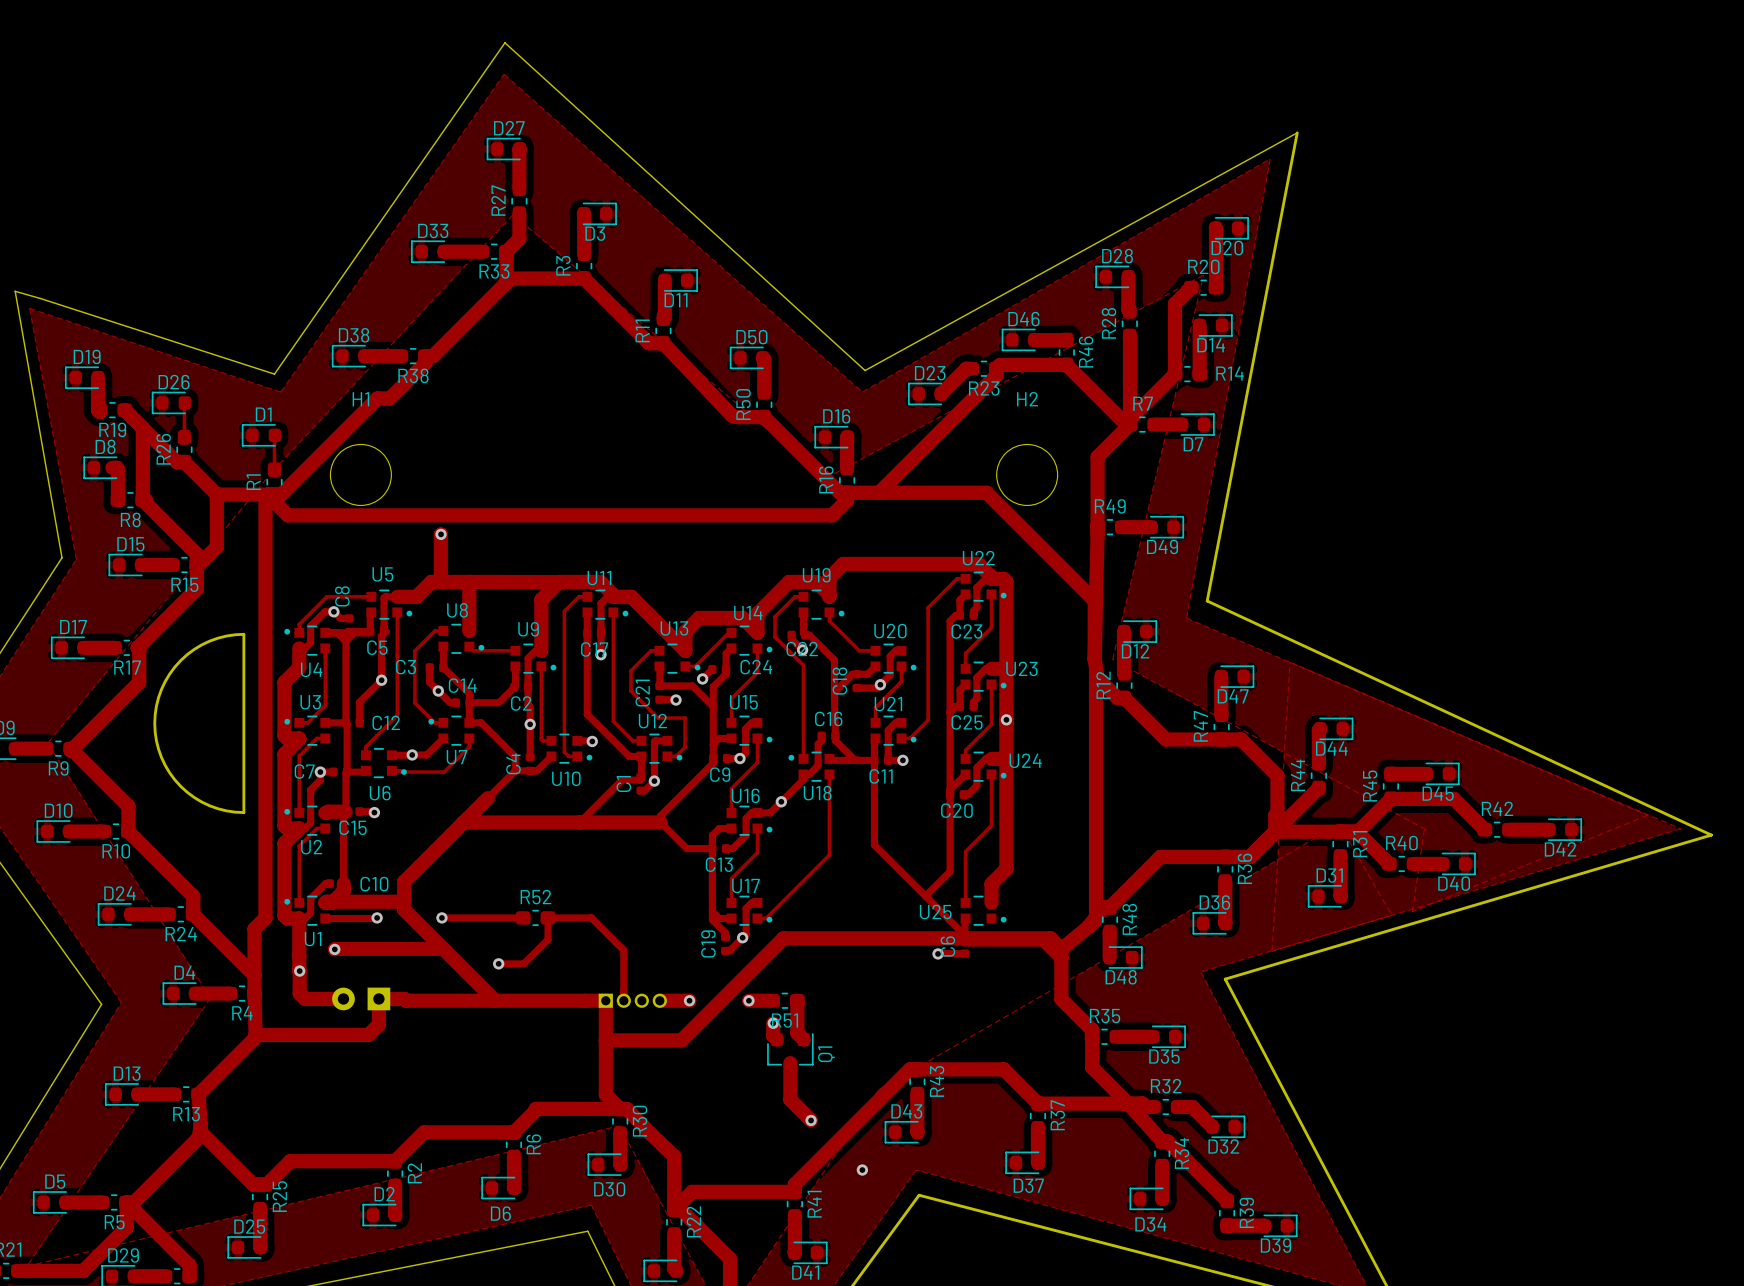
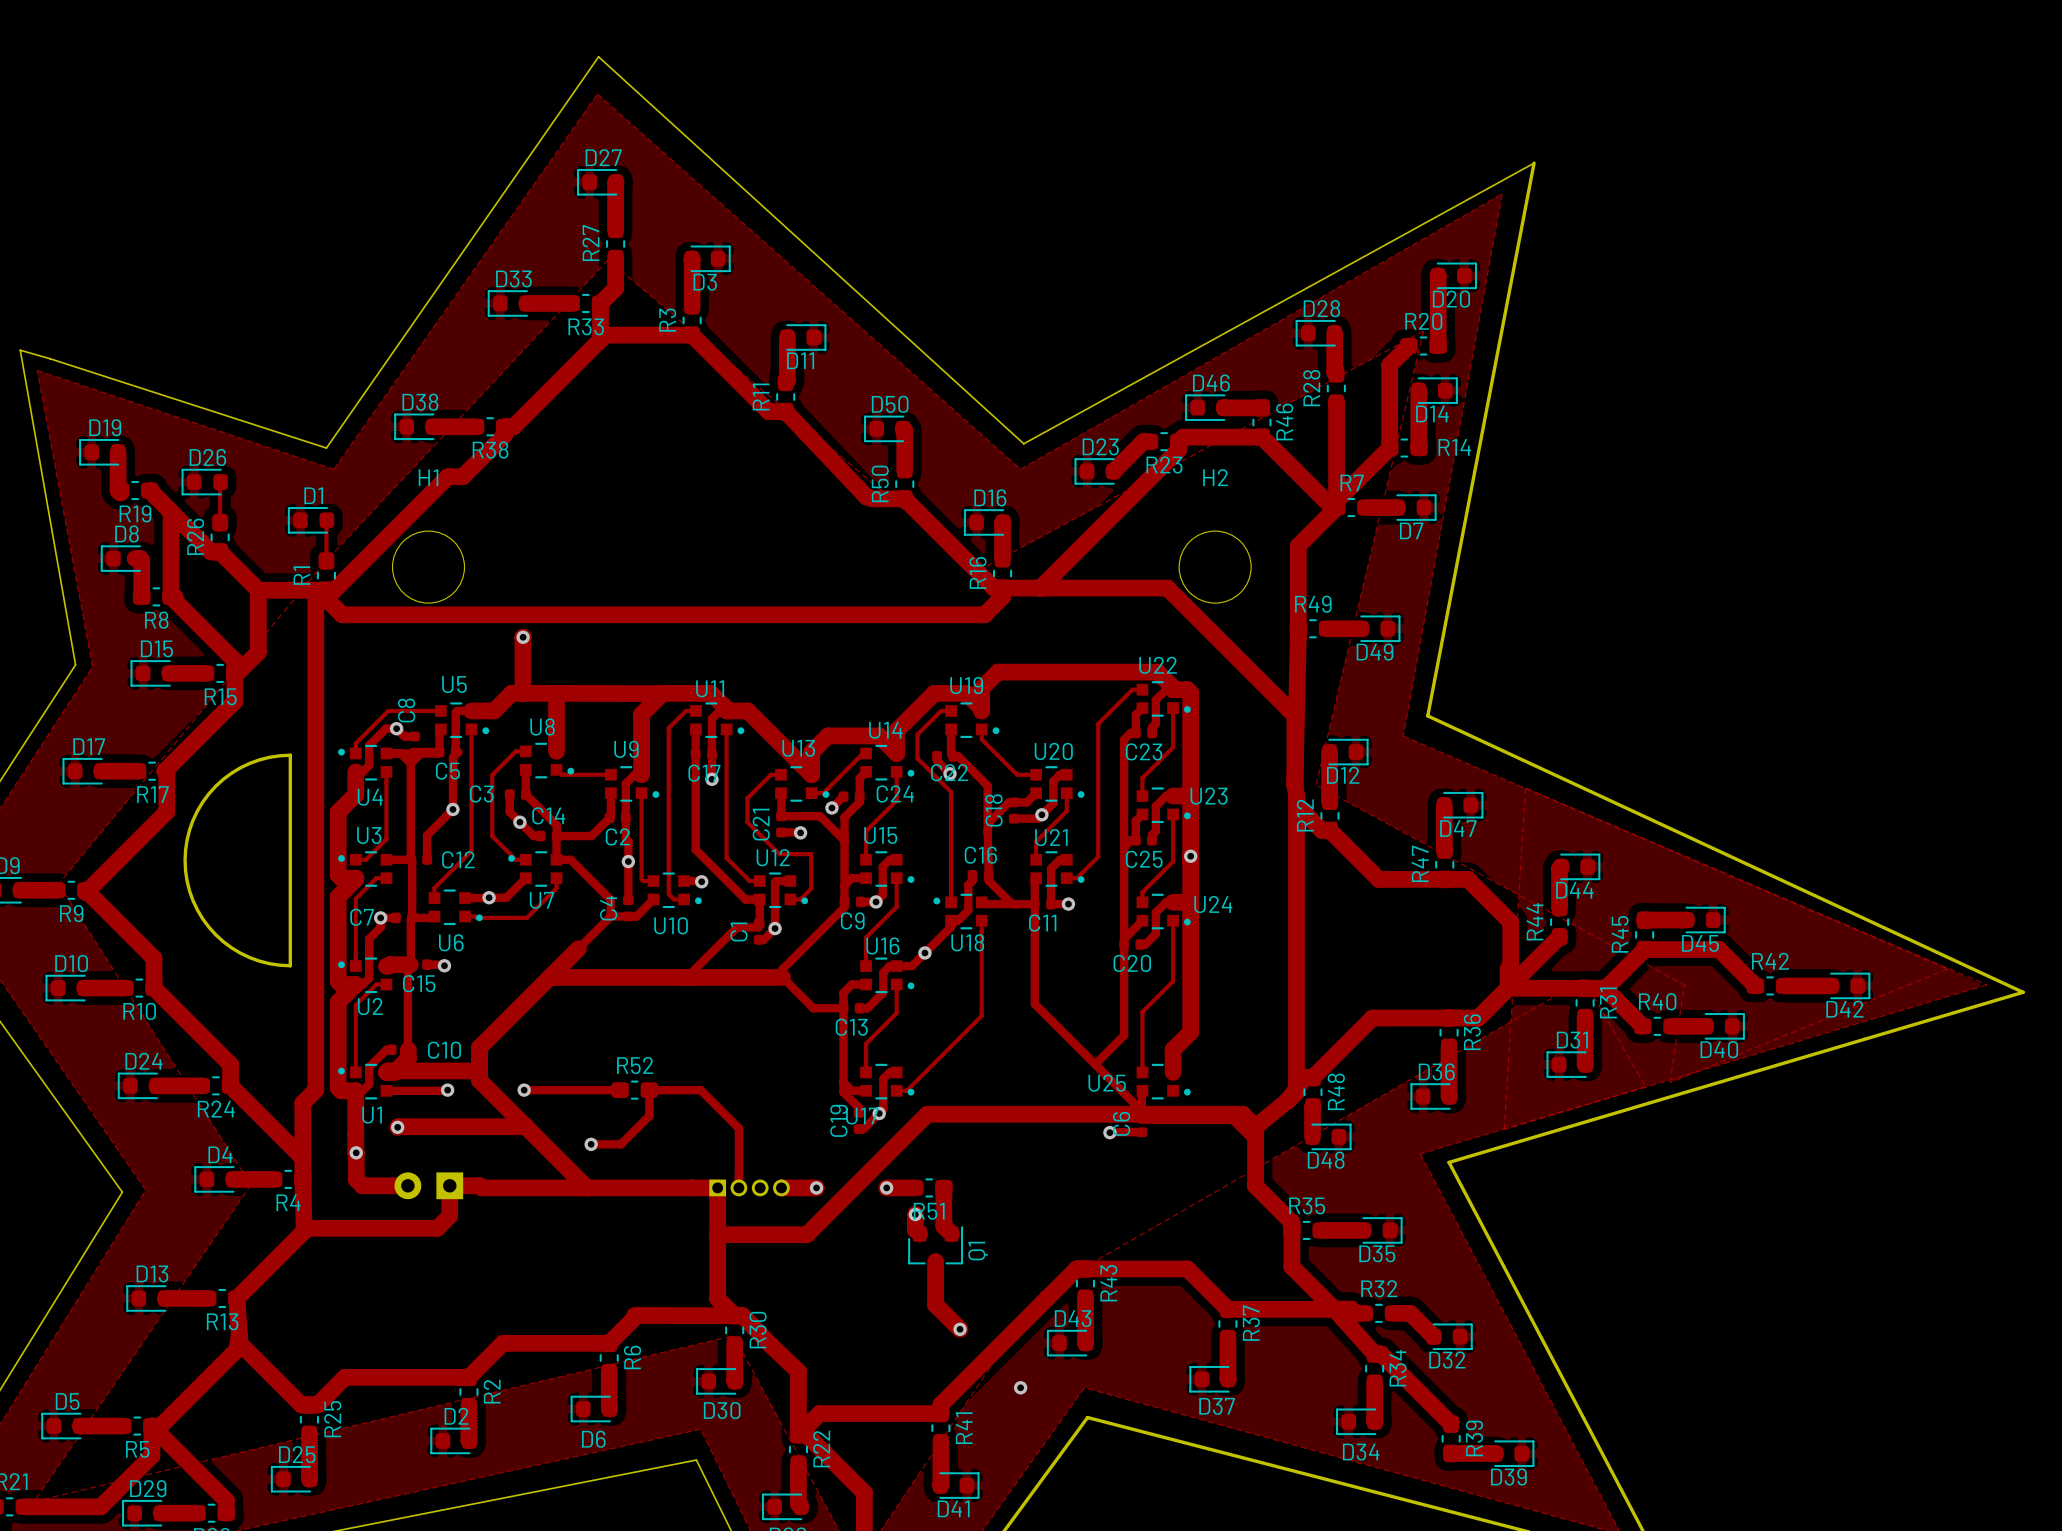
U17 name position: U17 (746, 885) -> U17 (862, 1116)

